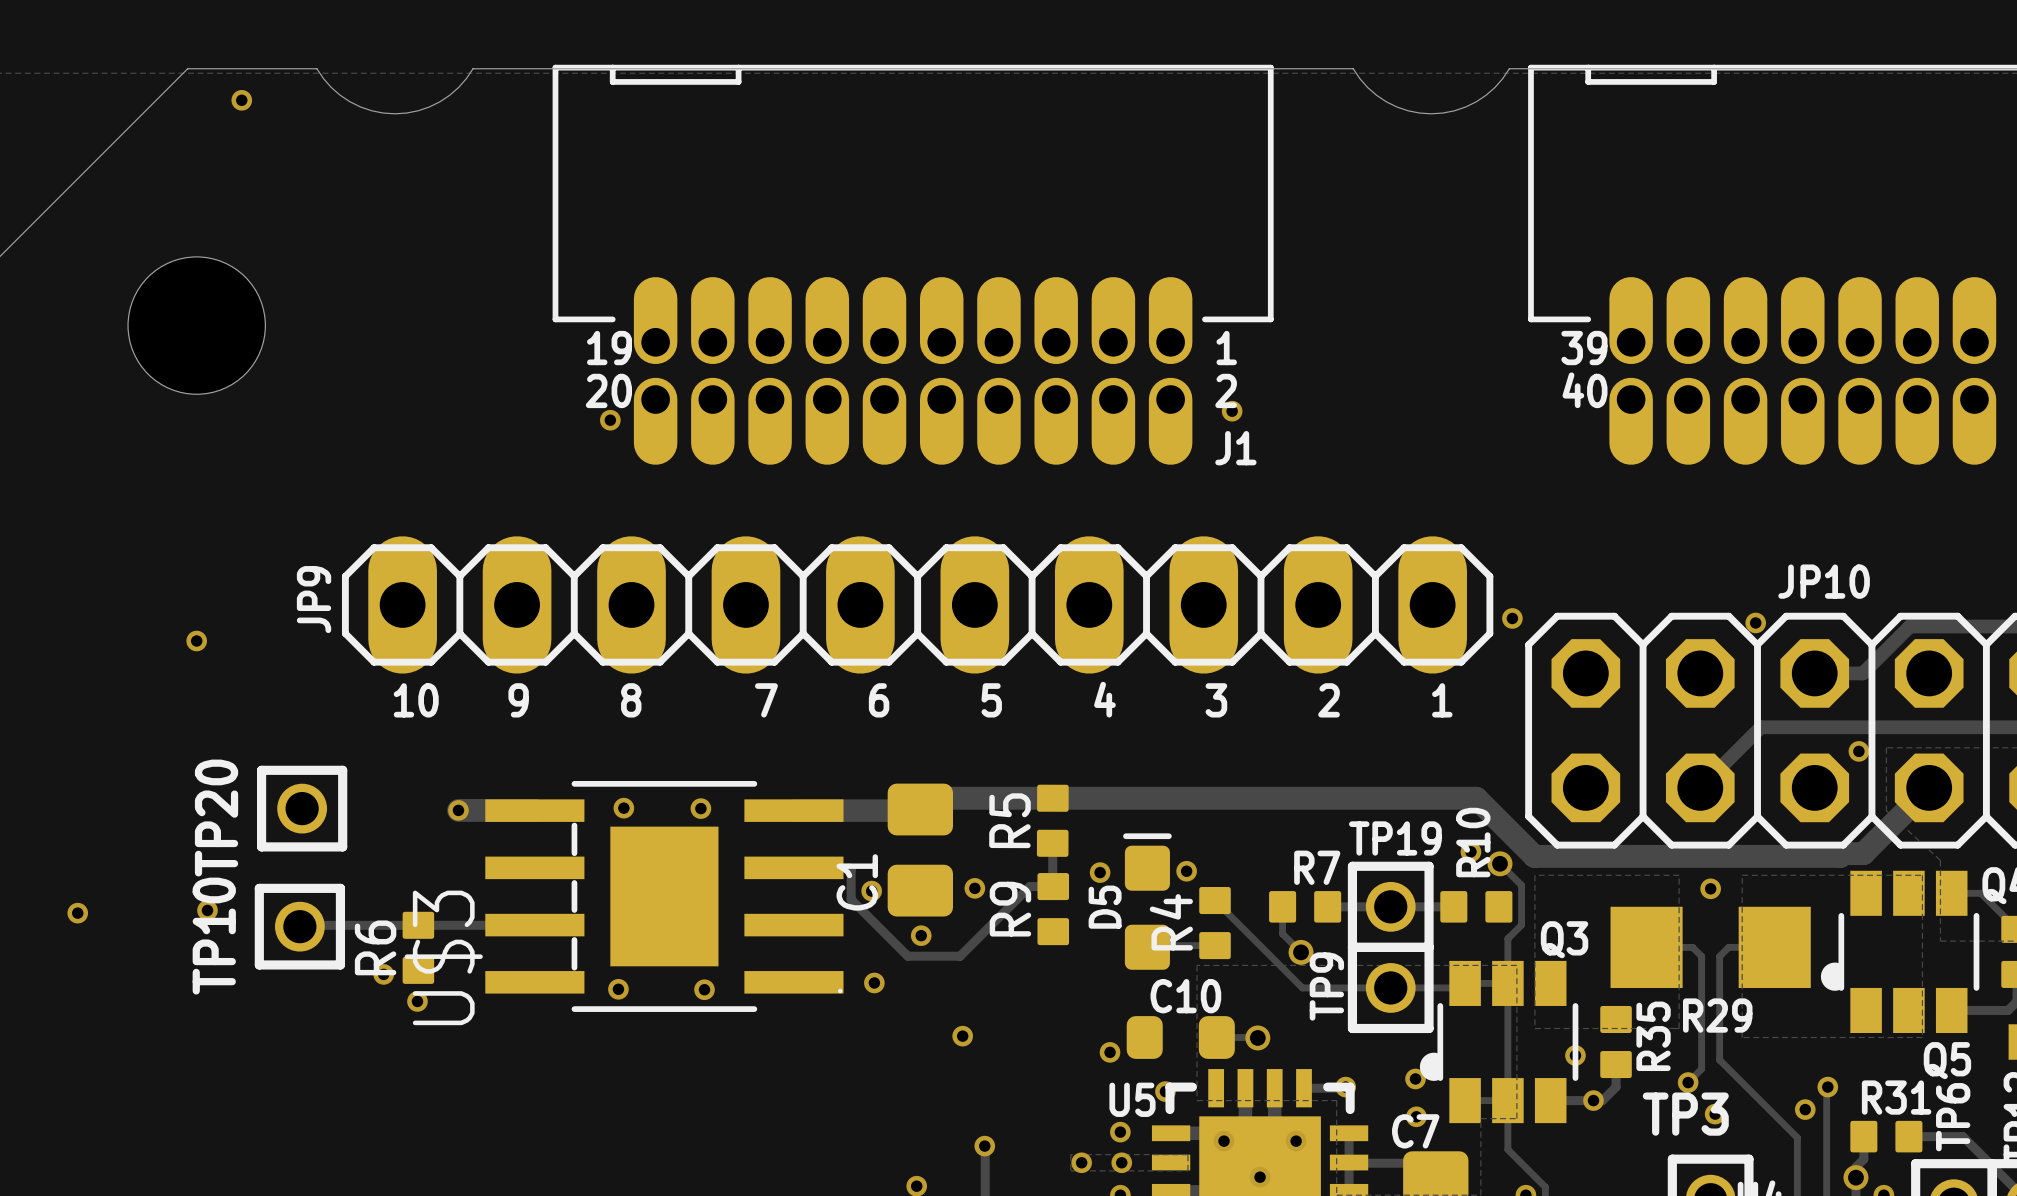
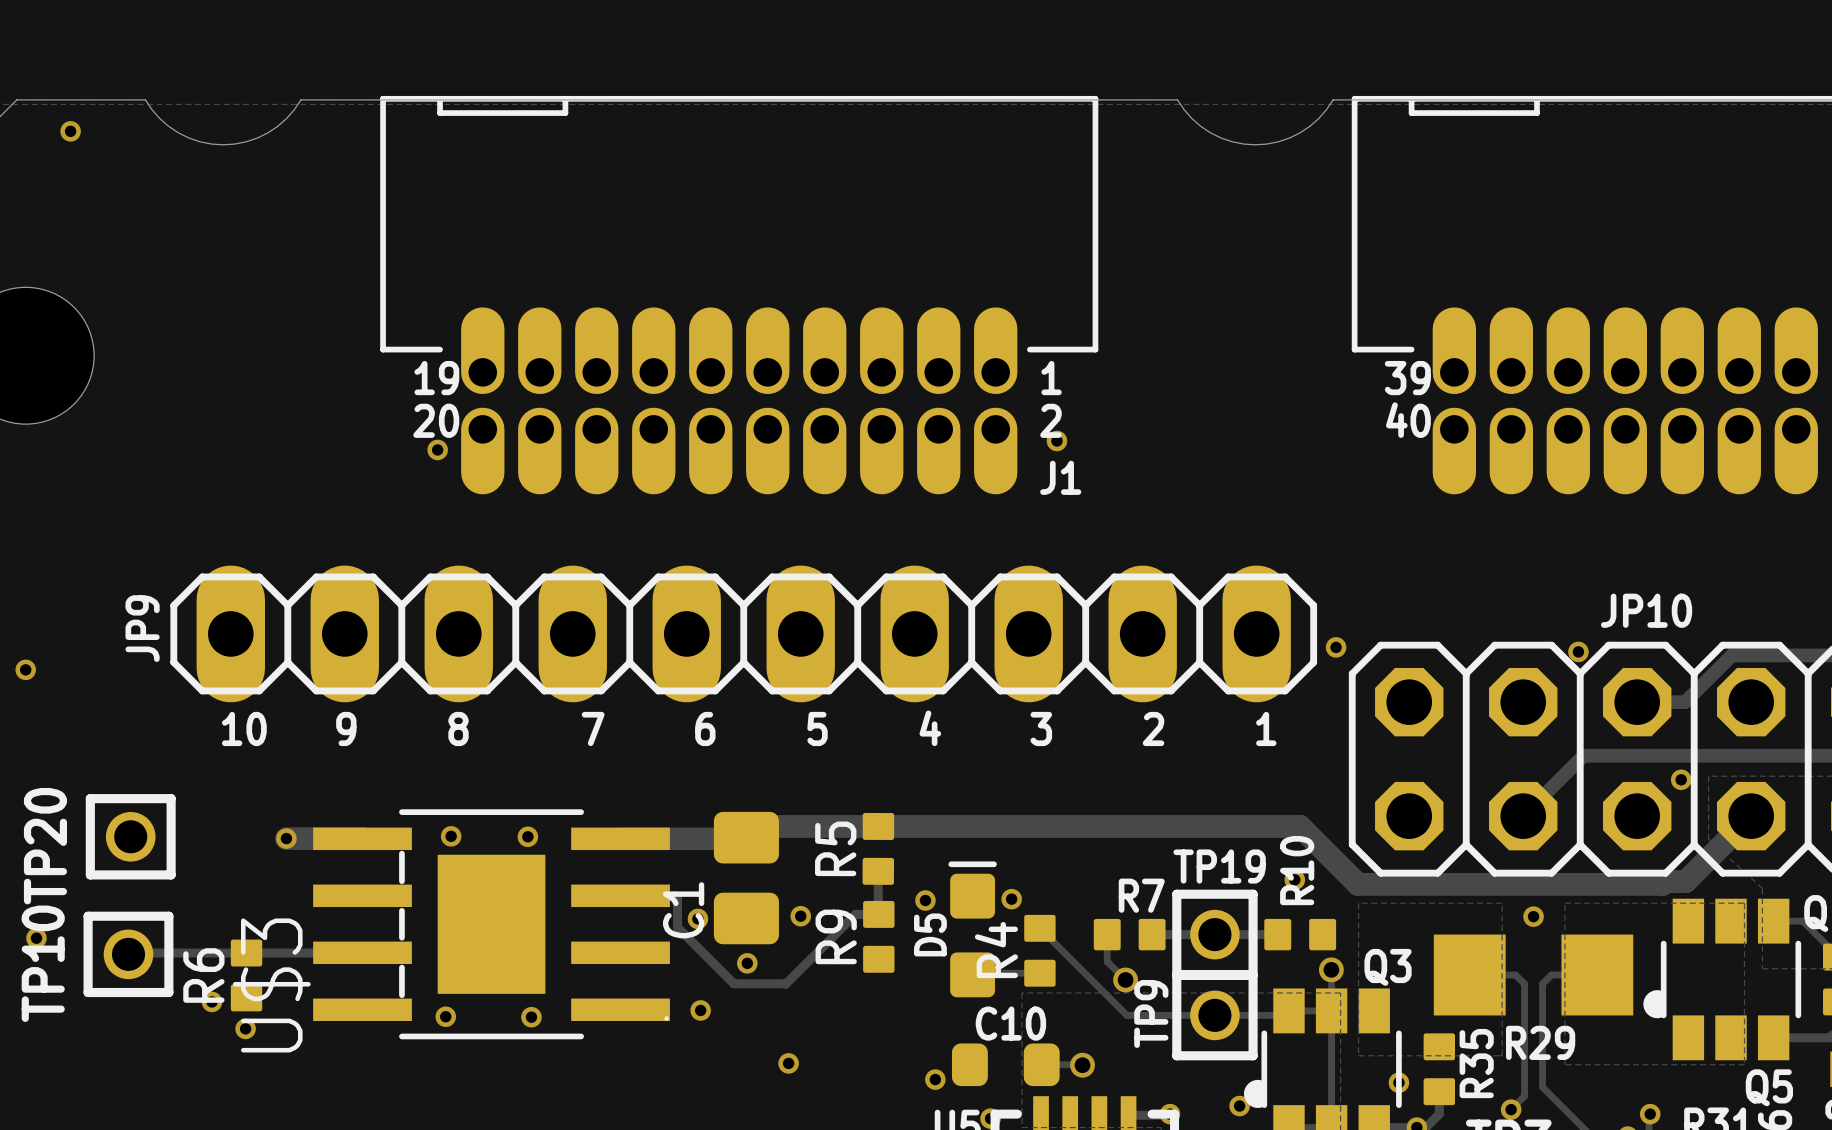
track: (1500, 863) (1521, 885) (1521, 925) (1507, 938) (1507, 942) -> none
via position: (1500, 863) -> (1331, 969)

